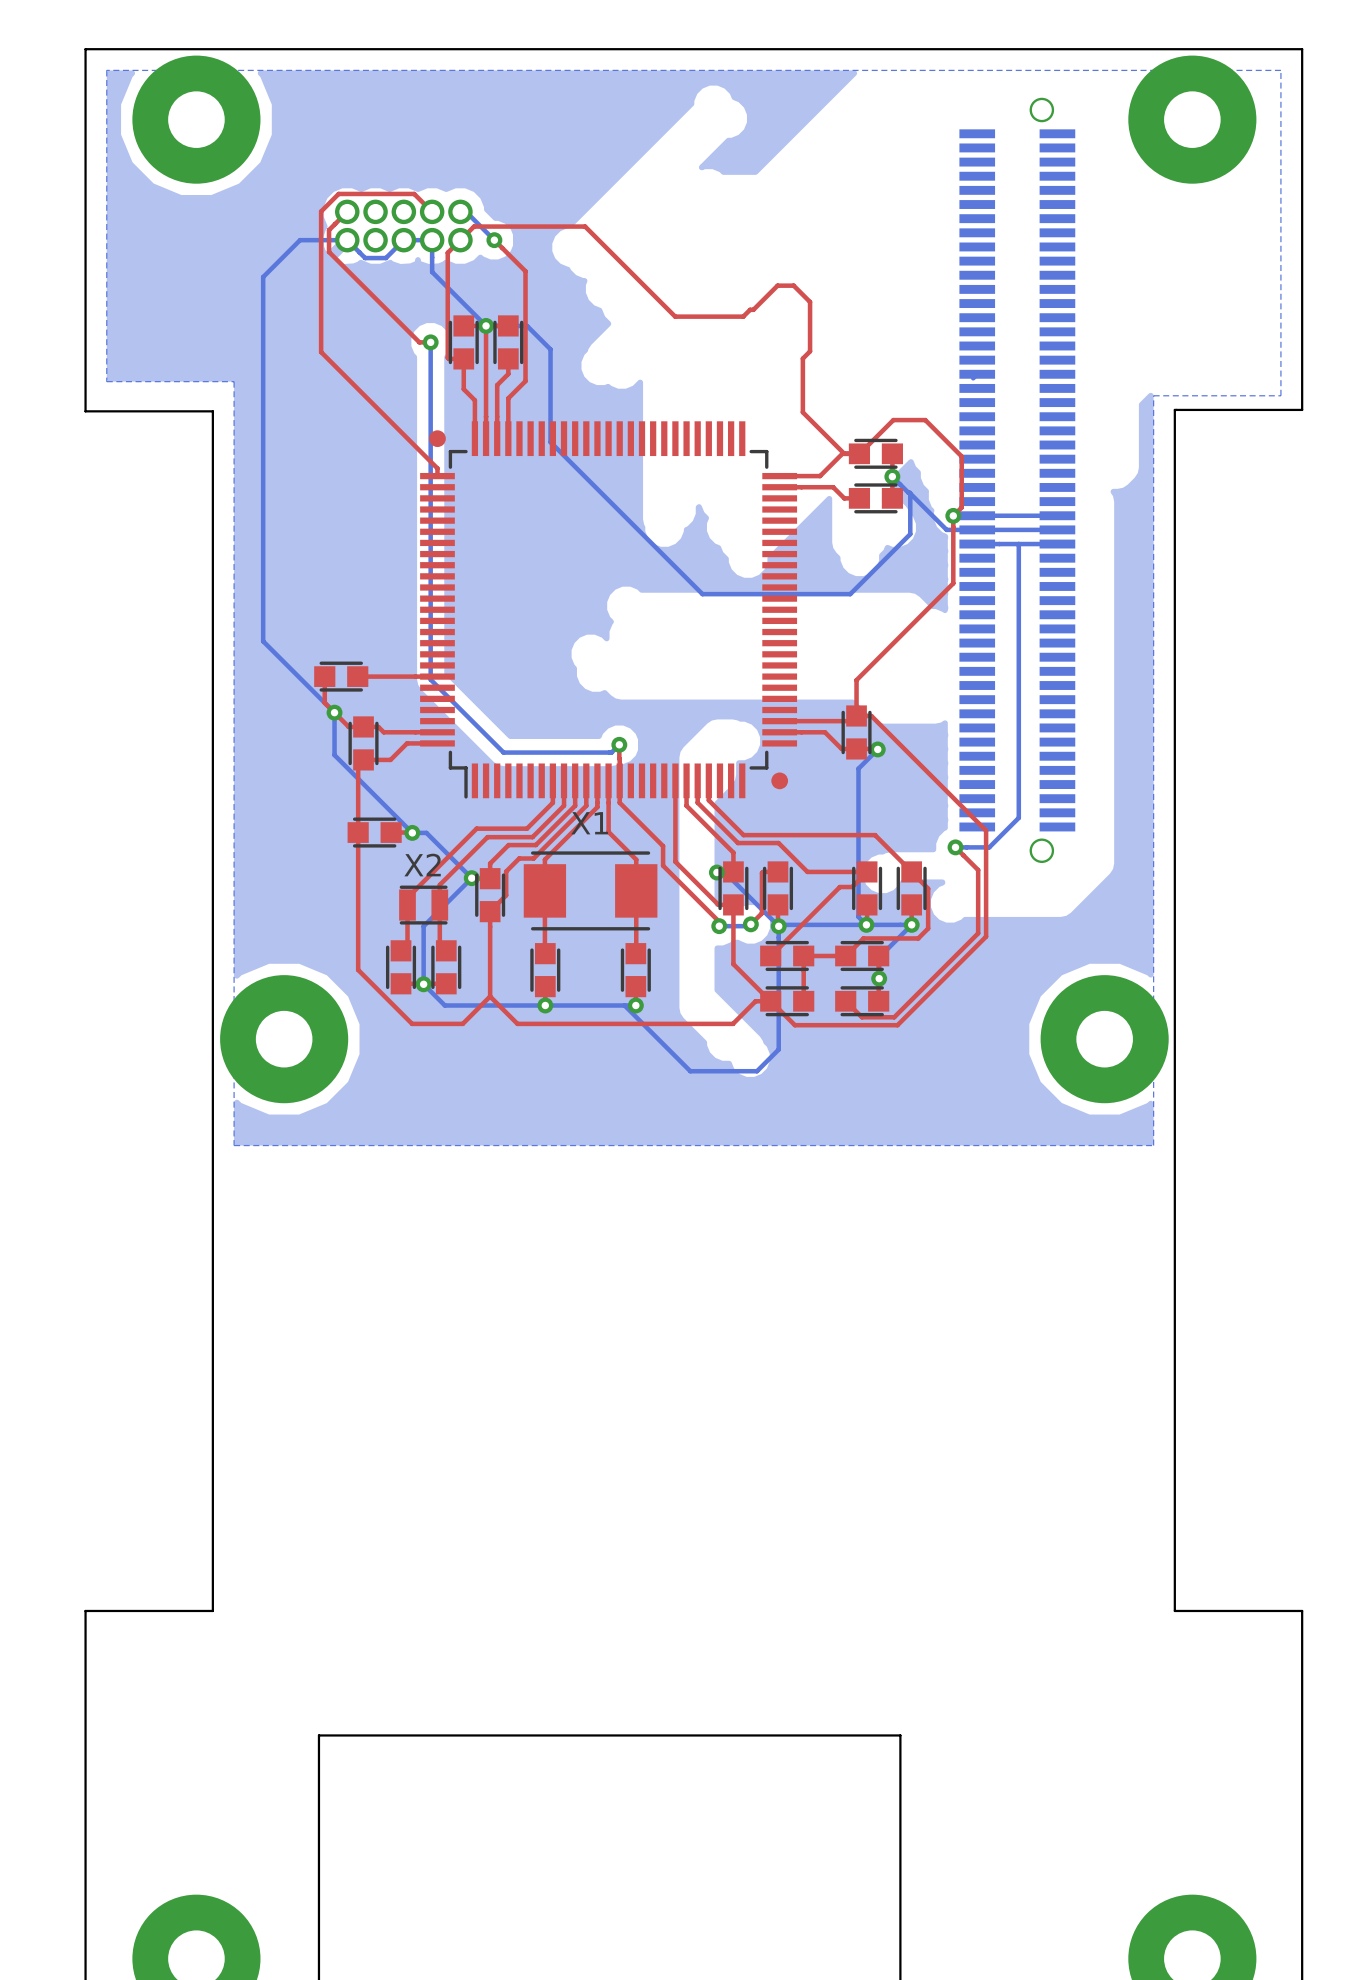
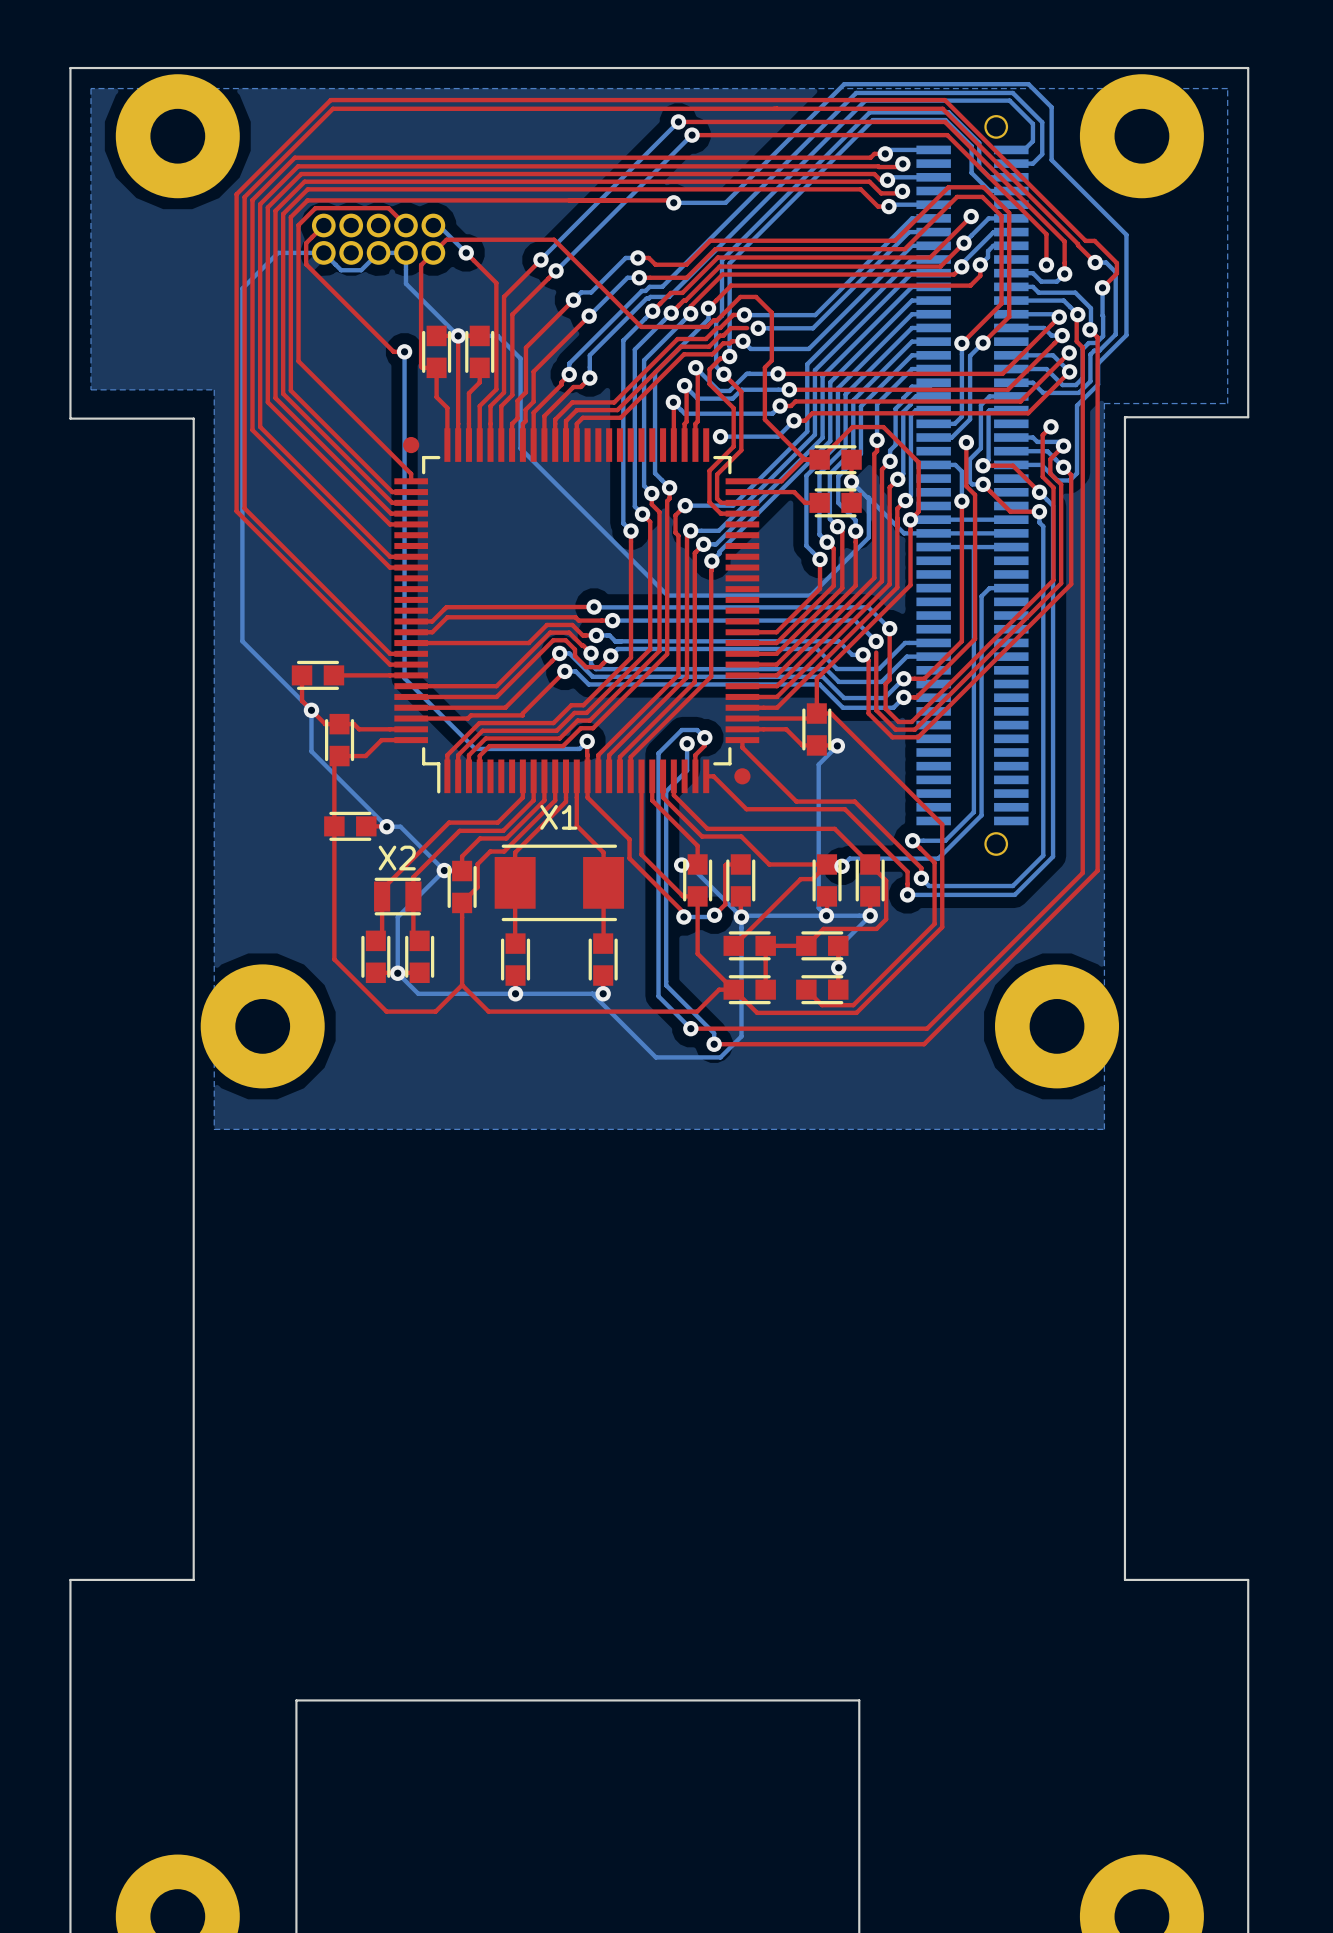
top track: none -> (678, 121) (945, 121) (1064, 241) (1064, 273)
bottom track: none -> (678, 121) (540, 259)
via: none -> (678, 121)
top track: none -> (692, 135) (947, 135) (1046, 234) (1046, 264)
bottom track: none -> (691, 135) (556, 270)
via: none -> (692, 135)
bottom track: none -> (933, 149) (889, 149) (885, 153)
bottom track: none -> (1024, 149) (1032, 141) (1032, 123) (1009, 100) (865, 100) (669, 296) (646, 298) (589, 355) (589, 378)
top track: none -> (885, 153) (874, 153) (870, 157) (294, 157) (252, 200) (252, 430) (389, 567) (411, 567)
via: none -> (885, 153)
bottom track: none -> (1011, 163) (1032, 163) (1042, 154) (1042, 122) (1012, 92) (856, 92) (662, 286) (649, 286) (645, 290) (641, 290) (569, 363) (569, 374)
top track: none -> (902, 163) (899, 167) (298, 166) (260, 204) (260, 426) (390, 556) (411, 556)
via: none -> (902, 163)
bottom track: none -> (933, 177) (890, 177) (887, 180)
bottom track: none -> (1011, 177) (989, 177) (979, 166) (979, 142) (948, 112) (869, 112) (721, 260) (721, 315) (716, 321) (716, 366) (723, 374)
top track: none -> (887, 180) (880, 180) (874, 174) (301, 174) (267, 207) (267, 402) (389, 524) (411, 524)
via: none -> (887, 180)
top track: none -> (902, 191) (900, 193) (881, 193) (869, 181) (304, 181) (275, 210) (275, 398) (391, 513) (411, 513)
via: none -> (902, 191)
bottom track: none -> (1011, 191) (989, 191) (971, 172) (971, 146) (945, 120) (872, 120) (729, 263) (729, 356)
top track: none -> (673, 202) (671, 200) (307, 200) (290, 217) (290, 390) (392, 492) (411, 492)
bottom track: none -> (673, 202) (725, 202) (844, 84) (1028, 84) (1051, 107) (1051, 160) (1126, 234) (1126, 335) (1098, 363) (1098, 384) (1077, 405) (1077, 473) (1069, 480) (1057, 480) (1041, 464) (1011, 464)
via: none -> (673, 202)
bottom track: none -> (933, 204) (890, 204) (888, 206)
top track: none -> (888, 206) (878, 206) (860, 189) (307, 189) (283, 214) (283, 393) (392, 502) (411, 502)
via: none -> (888, 206)
top track: none -> (971, 216) (930, 257) (717, 257) (682, 292) (670, 292) (652, 311)
via: none -> (971, 216)
bottom track: none -> (933, 218) (912, 218) (815, 315) (744, 315)
bottom track: none -> (1011, 218) (988, 218) (964, 243)
bottom track: none -> (933, 232) (909, 232) (812, 328) (758, 328)
bottom track: none -> (1011, 232) (993, 232) (961, 264) (961, 266)
top track: none -> (964, 243) (940, 266) (719, 266) (671, 313)
via: none -> (964, 243)
bottom track: none -> (933, 245) (912, 245) (808, 348) (750, 348) (742, 341)
bottom track: none -> (1011, 245) (993, 245) (988, 251) (988, 257) (980, 264)
top track: none -> (637, 257) (648, 257) (655, 264) (686, 264) (710, 240) (895, 240) (948, 187) (983, 187) (1009, 212) (1009, 316) (983, 342)
bottom track: none -> (637, 257) (625, 257) (591, 292) (581, 292) (573, 300)
via: none -> (637, 257)
bottom track: none -> (933, 259) (912, 259) (807, 364) (807, 431) (733, 505) (685, 505)
top track: none -> (540, 259) (504, 296) (504, 392) (490, 406) (490, 445)
via: none -> (540, 259)
top track: none -> (1095, 262) (942, 108) (332, 108) (244, 197) (244, 508) (390, 653) (411, 653)
bottom track: none -> (1095, 262) (1106, 262) (1115, 272) (1115, 334) (1099, 350) (1094, 350) (1090, 354) (1090, 381) (1078, 392) (1043, 392) (1032, 382) (1011, 382)
via: none -> (1095, 262)
top track: none -> (980, 264) (980, 275) (970, 285) (731, 285) (708, 308)
via: none -> (980, 264)
via: none -> (1046, 264)
top track: none -> (961, 266) (954, 274) (722, 274) (690, 306) (690, 313)
via: none -> (961, 266)
top track: none -> (556, 270) (512, 314) (512, 395) (501, 406) (501, 445)
via: none -> (556, 270)
bottom track: none -> (933, 273) (912, 273) (814, 370) (814, 434) (718, 530) (690, 530)
bottom track: none -> (1011, 273) (1032, 273) (1041, 281) (1056, 281) (1064, 273)
via: none -> (1064, 273)
top track: none -> (639, 277) (686, 277) (715, 249) (904, 249) (957, 196) (982, 196) (1001, 216) (1001, 303) (961, 343)
bottom track: none -> (639, 277) (627, 277) (589, 316)
via: none -> (639, 277)
bottom track: none -> (933, 286) (912, 286) (822, 376) (822, 437) (716, 544) (703, 544)
bottom track: none -> (1011, 286) (1032, 286) (1038, 292) (1075, 292) (1090, 308) (1089, 329)
top track: none -> (1102, 287) (1116, 273) (1116, 263) (1094, 240) (1085, 240) (944, 100) (330, 100) (236, 194) (236, 511) (389, 664) (411, 664)
bottom track: none -> (1102, 287) (1103, 336) (1096, 342) (1088, 342) (1082, 349) (1082, 378) (1075, 385) (1062, 385) (1046, 369) (1011, 369)
via: none -> (1102, 287)
top track: none -> (573, 300) (525, 347) (525, 392) (517, 400) (517, 418) (512, 423) (512, 445)
via: none -> (573, 300)
bottom track: none -> (933, 300) (912, 300) (830, 382) (830, 441) (711, 561)
bottom track: none -> (1011, 300) (1063, 300) (1077, 314)
bottom track: none -> (708, 308) (708, 319) (655, 372) (655, 473) (669, 487)
via: none -> (708, 308)
bottom track: none -> (652, 311) (623, 340) (623, 523) (631, 531)
via: none -> (652, 311)
bottom track: none -> (671, 313) (634, 349) (634, 506) (642, 514)
via: none -> (671, 313)
bottom track: none -> (690, 313) (644, 360) (644, 485) (651, 493)
via: none -> (690, 313)
bottom track: none -> (933, 314) (912, 314) (837, 388) (837, 444) (806, 475) (806, 545) (820, 559)
bottom track: none -> (1011, 314) (1056, 314) (1059, 317)
top track: none -> (1077, 314) (1076, 341) (1082, 347) (1082, 872) (927, 1028) (690, 1028)
via: none -> (1077, 314)
top track: none -> (744, 314) (733, 314) (705, 339) (677, 339) (614, 402) (572, 402) (555, 419) (555, 445)
via: none -> (744, 314)
top track: none -> (589, 316) (533, 371) (533, 401) (525, 409) (525, 421) (522, 423) (522, 445)
via: none -> (589, 316)
top track: none -> (1059, 317) (1002, 373) (778, 373)
via: none -> (1059, 317)
top track: none -> (747, 328) (730, 328) (709, 346) (680, 346) (617, 410) (576, 410) (566, 421) (566, 445)
bottom track: none -> (933, 327) (912, 327) (845, 394) (845, 447) (819, 473) (819, 534) (827, 542)
bottom track: none -> (1011, 327) (1043, 327) (1051, 335) (1062, 335)
via: none -> (758, 328)
top track: none -> (1089, 329) (1097, 337) (1097, 870) (924, 1044) (714, 1044)
via: none -> (1089, 329)
top track: none -> (1062, 335) (1008, 389) (789, 389)
via: none -> (1062, 335)
top track: none -> (742, 341) (723, 343) (712, 354) (684, 354) (620, 417) (582, 417) (576, 423) (576, 445)
via: none -> (742, 341)
bottom track: none -> (933, 341) (912, 341) (853, 400) (853, 450) (829, 474) (829, 518) (837, 526)
bottom track: none -> (961, 343) (961, 416) (954, 423) (933, 423)
via: none -> (961, 343)
bottom track: none -> (983, 342) (970, 355) (970, 419) (951, 437) (933, 437)
via: none -> (983, 342)
top track: none -> (1069, 352) (1020, 401) (795, 401) (791, 406) (780, 406)
via: none -> (1069, 352)
bottom track: none -> (933, 355) (912, 355) (860, 406) (860, 453) (838, 476) (838, 502) (855, 520) (855, 531)
bottom track: none -> (1011, 355) (1053, 355) (1069, 371)
via: none -> (729, 356)
top track: none -> (726, 358) (720, 358) (709, 369) (709, 384) (733, 408) (733, 446) (709, 470) (709, 502) (720, 513) (742, 513)
top track: none -> (695, 367) (697, 369) (697, 421) (695, 423) (695, 445)
bottom track: none -> (695, 367) (718, 390) (729, 390) (746, 373) (778, 373)
via: none -> (695, 367)
bottom track: none -> (933, 369) (912, 369) (877, 403) (877, 440)
top track: none -> (1069, 371) (1028, 413) (812, 413) (804, 420) (794, 420)
via: none -> (1069, 371)
top track: none -> (569, 374) (533, 412) (533, 445)
via: none -> (569, 374)
top track: none -> (723, 374) (741, 391) (741, 450) (717, 474) (717, 498) (721, 502) (742, 502)
via: none -> (723, 374)
via: none -> (778, 373)
top track: none -> (589, 378) (580, 387) (573, 387) (544, 416) (544, 445)
via: none -> (589, 378)
top track: none -> (684, 385) (686, 387) (684, 445)
bottom track: none -> (684, 385) (697, 398) (732, 398) (741, 389) (789, 389)
via: none -> (684, 385)
bottom track: none -> (929, 386) (912, 386) (903, 401) (895, 408) (895, 444) (890, 450) (890, 461) (894, 459)
via: none -> (789, 389)
bottom track: none -> (933, 396) (915, 396) (903, 411) (903, 473) (897, 479)
bottom track: none -> (1011, 396) (989, 396) (980, 405) (980, 448) (969, 459) (969, 481) (972, 484) (983, 484)
top track: none -> (673, 402) (673, 445)
bottom track: none -> (673, 402) (684, 413) (772, 413) (780, 406)
via: none -> (673, 402)
via: none -> (780, 406)
bottom track: none -> (933, 410) (915, 410) (910, 415) (910, 495) (905, 500)
bottom track: none -> (1011, 410) (988, 411) (988, 460) (983, 465)
bottom track: none -> (794, 420) (778, 436) (720, 436)
via: none -> (794, 420)
top track: none -> (1051, 426) (1042, 435) (1042, 476) (1053, 487) (1053, 580) (911, 721) (898, 721) (885, 708) (885, 683) (889, 679) (889, 628)
via: none -> (1051, 426)
via: none -> (720, 436)
bottom track: none -> (1011, 437) (1032, 437) (1037, 441) (1059, 441) (1063, 446)
top track: none -> (877, 440) (877, 451) (874, 453) (874, 577) (776, 675) (742, 675)
via: none -> (877, 440)
top track: none -> (966, 442) (966, 486) (975, 494) (975, 638) (916, 697) (903, 697)
via: none -> (966, 442)
top track: none -> (1063, 446) (1050, 459) (1050, 473) (1061, 484) (1061, 583) (914, 729) (895, 729) (876, 710) (876, 652)
via: none -> (1063, 446)
bottom track: none -> (1011, 451) (1047, 451) (1063, 467)
top track: none -> (890, 461) (881, 469) (881, 581) (776, 686) (742, 686)
via: none -> (890, 461)
bottom track: none -> (933, 464) (955, 464) (961, 471) (961, 501)
top track: none -> (983, 465) (1012, 465) (1039, 492)
via: none -> (983, 465)
top track: none -> (1063, 467) (1071, 475) (1071, 584) (918, 737) (892, 737) (868, 713) (868, 660) (863, 654)
via: none -> (1063, 467)
top track: none -> (897, 479) (889, 487) (889, 584) (777, 696) (742, 696)
via: none -> (897, 479)
top track: none -> (983, 484) (1010, 511) (1039, 511)
via: none -> (983, 484)
top track: none -> (669, 487) (669, 498) (667, 501) (667, 654) (592, 728) (580, 728) (563, 746) (489, 746) (479, 755) (479, 776)
via: none -> (669, 487)
bottom track: none -> (1039, 492) (1053, 505) (1053, 856) (1014, 894) (907, 894)
via: none -> (1039, 492)
top track: none -> (651, 493) (651, 504) (659, 512) (659, 650) (589, 720) (577, 720) (559, 738) (485, 738) (468, 755) (468, 776)
via: none -> (651, 493)
top track: none -> (905, 500) (897, 508) (897, 587) (777, 707) (742, 707)
via: none -> (905, 500)
top track: none -> (961, 501) (961, 641) (924, 678) (903, 678)
via: none -> (961, 501)
top track: none -> (685, 505) (675, 515) (675, 532) (678, 535) (678, 675) (598, 755) (598, 776)
via: none -> (685, 505)
bottom track: none -> (1039, 511) (1039, 522) (1043, 526) (1043, 855) (1012, 886) (929, 886) (921, 878)
via: none -> (1039, 511)
top track: none -> (642, 514) (650, 521) (650, 649) (586, 712) (574, 712) (556, 730) (482, 730) (458, 755) (458, 776)
via: none -> (642, 514)
top track: none -> (837, 526) (842, 531) (842, 588) (776, 653) (742, 653)
via: none -> (837, 526)
top track: none -> (631, 531) (631, 657) (583, 705) (571, 705) (553, 723) (479, 723) (447, 755) (447, 776)
via: none -> (631, 531)
top track: none -> (690, 530) (687, 534) (687, 677) (609, 755) (609, 776)
via: none -> (690, 530)
top track: none -> (855, 531) (855, 585) (776, 664) (742, 664)
via: none -> (855, 531)
top track: none -> (827, 542) (833, 548) (833, 585) (776, 643) (742, 643)
via: none -> (827, 542)
top track: none -> (703, 544) (694, 553) (694, 682) (619, 757) (619, 776)
via: none -> (703, 544)
top track: none -> (820, 559) (820, 588) (776, 632) (742, 632)
via: none -> (820, 559)
top track: none -> (711, 561) (711, 676) (630, 757) (630, 776)
via: none -> (711, 561)
bottom track: none -> (1011, 588) (989, 588) (981, 596) (981, 815) (938, 858) (849, 858) (842, 866)
top track: none -> (594, 607) (446, 607) (432, 621) (411, 621)
via: none -> (594, 607)
bottom track: none -> (594, 607) (868, 607) (889, 628)
top track: none -> (612, 620) (578, 620) (575, 617) (447, 617) (432, 632) (411, 632)
bottom track: none -> (612, 620) (855, 620) (876, 641)
via: none -> (612, 620)
via: none -> (889, 628)
top track: none -> (596, 635) (582, 635) (572, 624) (546, 624) (528, 643) (411, 643)
bottom track: none -> (596, 635) (609, 635) (615, 641)
via: none -> (596, 635)
bottom track: none -> (614, 641) (838, 641) (852, 654) (863, 654)
via: none -> (876, 641)
bottom track: none -> (933, 642) (905, 642) (879, 669) (836, 669) (816, 648) (617, 648) (610, 655)
top track: none -> (559, 653) (505, 707) (411, 707)
bottom track: none -> (559, 653) (569, 653) (592, 676) (822, 676) (844, 698) (884, 698) (903, 678)
via: none -> (559, 653)
top track: none -> (591, 653) (569, 632) (550, 632) (496, 686) (411, 686)
bottom track: none -> (591, 653) (591, 664) (595, 669) (826, 669) (838, 681) (881, 681) (906, 656) (933, 656)
via: none -> (591, 653)
via: none -> (863, 654)
top track: none -> (610, 655) (599, 667) (586, 667) (575, 656) (575, 649) (565, 640) (553, 640) (496, 696) (411, 696)
via: none -> (610, 655)
top track: none -> (564, 671) (522, 715) (470, 715) (467, 718) (411, 718)
bottom track: none -> (564, 671) (575, 671) (588, 684) (819, 684) (843, 707) (893, 707) (903, 697)
via: none -> (564, 671)
via: none -> (903, 678)
via: none -> (903, 697)
top track: none -> (704, 737) (704, 745) (695, 755) (695, 776)
bottom track: none -> (704, 737) (697, 730) (681, 730) (658, 753) (658, 996) (690, 1028)
via: none -> (704, 737)
top track: none -> (742, 740) (742, 747) (796, 801) (854, 801) (921, 868) (921, 878)
bottom track: none -> (687, 743) (687, 770) (666, 791) (666, 985) (714, 1033) (714, 1044)
via: none -> (687, 743)
top track: none -> (706, 776) (713, 776) (746, 809) (844, 809) (907, 871) (907, 894)
via: none -> (842, 866)
via: none -> (921, 878)
via: none -> (907, 894)
via: none -> (690, 1028)
via: none -> (714, 1044)

